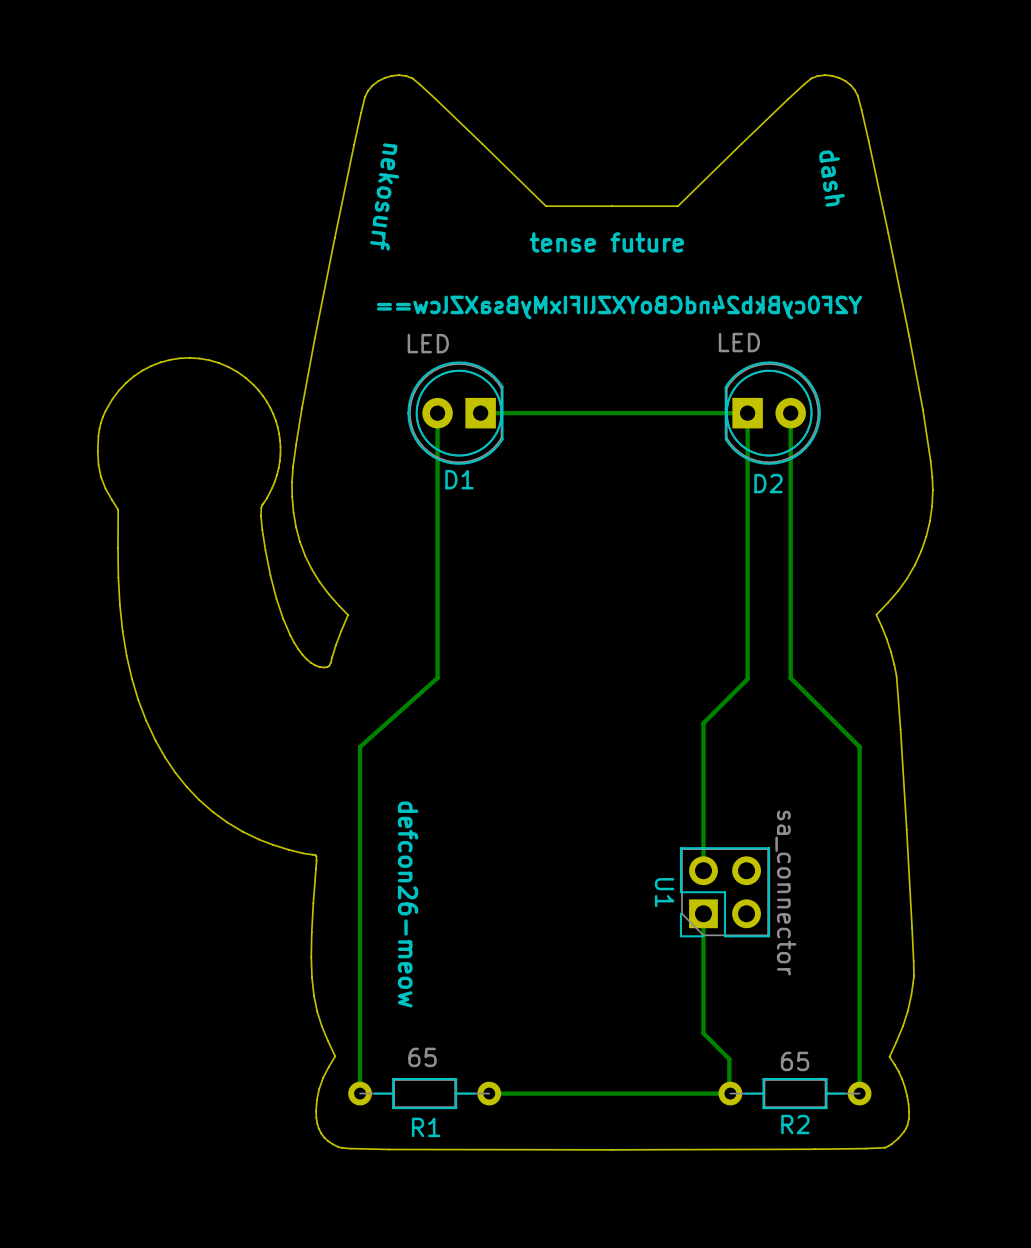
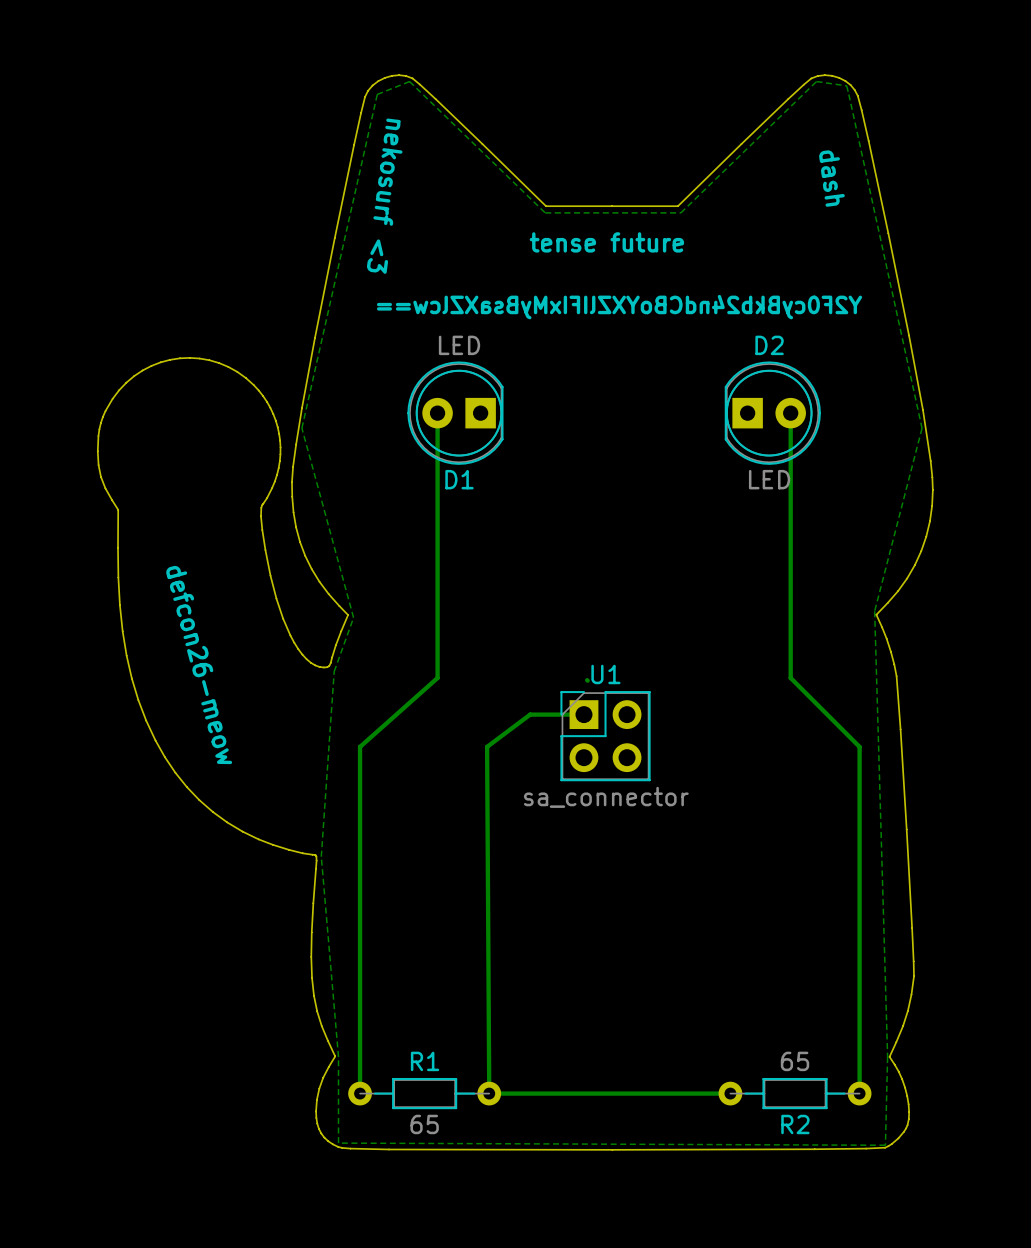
zone outline: none -> (816, 81) (680, 212) (545, 212) (409, 81) (377, 94) (301, 428) (353, 617) (334, 671) (321, 856) (338, 1056) (338, 1143) (885, 1145) (887, 1056) (874, 611) (922, 428) (846, 85) (816, 81)
text: nekosurf (384, 196) -> nekosurf <3 (384, 196)
D2 value position: LED (739, 342) -> LED (769, 479)
D1 value position: LED (428, 343) -> LED (459, 345)
track: (480, 413) (747, 413) (747, 679) (703, 723) (703, 870) -> none
D2 name position: D2 (768, 483) -> D2 (769, 345)
track: none -> (587, 680) (587, 680)
track: none -> (583, 714) (530, 714) (487, 746) (489, 1091)
U1 rotation: 0° (725, 892) -> 90° clockwise (605, 736)
U1 position: (725, 892) -> (605, 736)
text rotation: 0° (408, 904) -> 15° counterclockwise (199, 664)
text position: defcon26-meow (408, 904) -> defcon26-meow (199, 664)
track: (703, 913) (703, 1033) (729, 1059) (730, 1093) -> none
R1 value position: 65 (422, 1057) -> 65 (424, 1124)
R1 name position: R1 (426, 1127) -> R1 (425, 1061)

